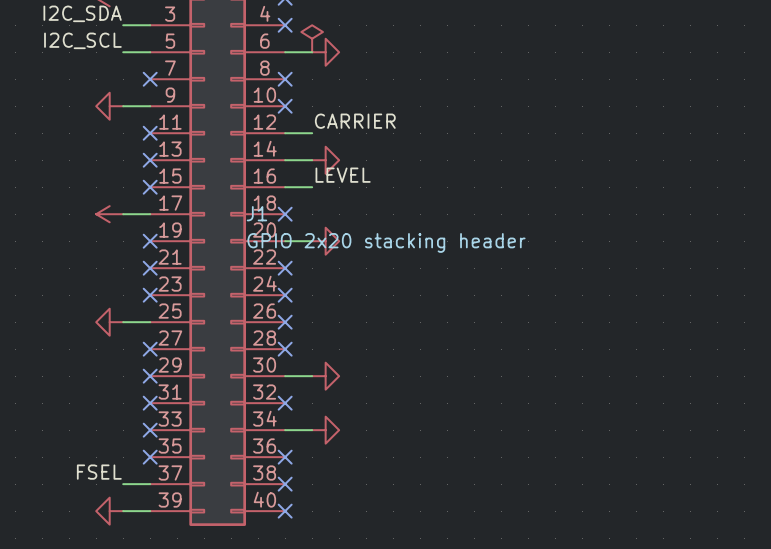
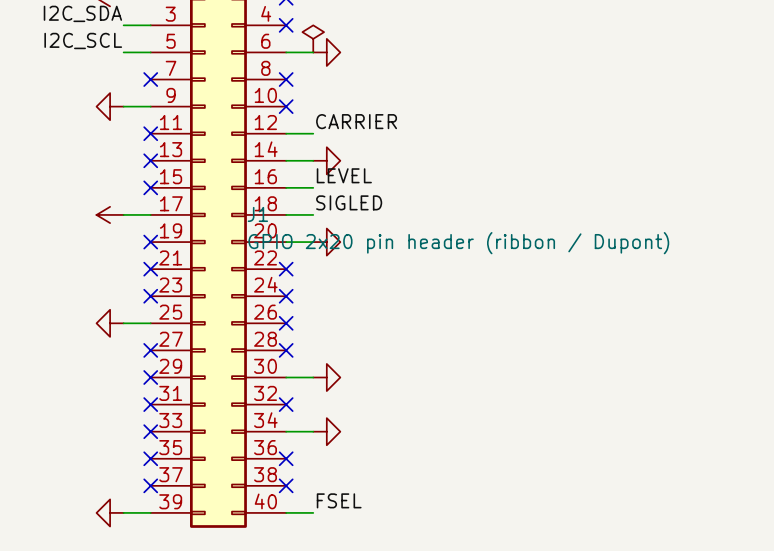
label: none -> SIGLED (349, 202)
wire: none -> (286, 214) (313, 214)
no-connect mark: (285, 214) -> none
J1 value: GPIO 2x20 stacking header (386, 242) -> GPIO 2x20 pin header (ribbon / Dupont) (458, 243)
label position: FSEL (99, 472) -> FSEL (339, 500)
wire: (123, 484) (150, 484) -> (286, 512) (313, 512)
no-connect mark: none -> (150, 485)
no-connect mark: (285, 511) -> none

